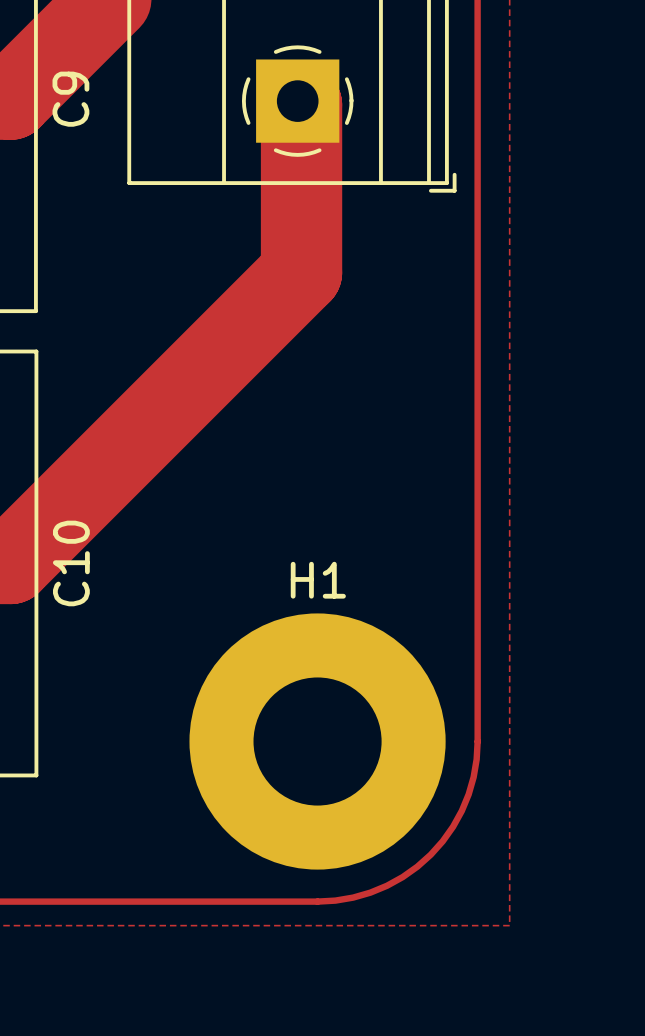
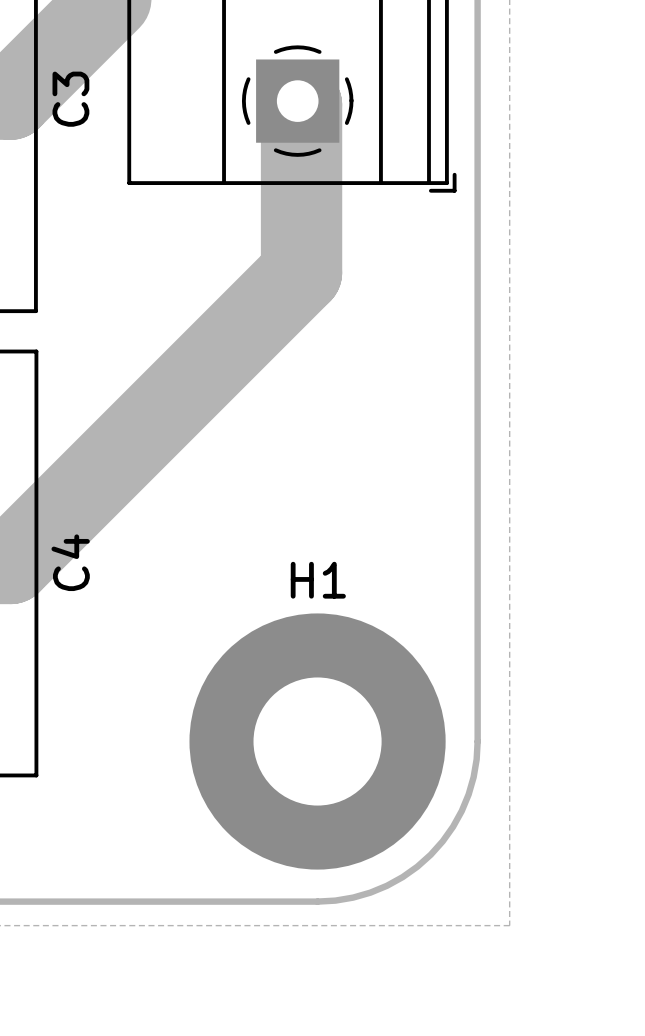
C9 name: C9 (70, 99) -> C3 (70, 99)
C10 name: C10 (71, 563) -> C4 (70, 562)

